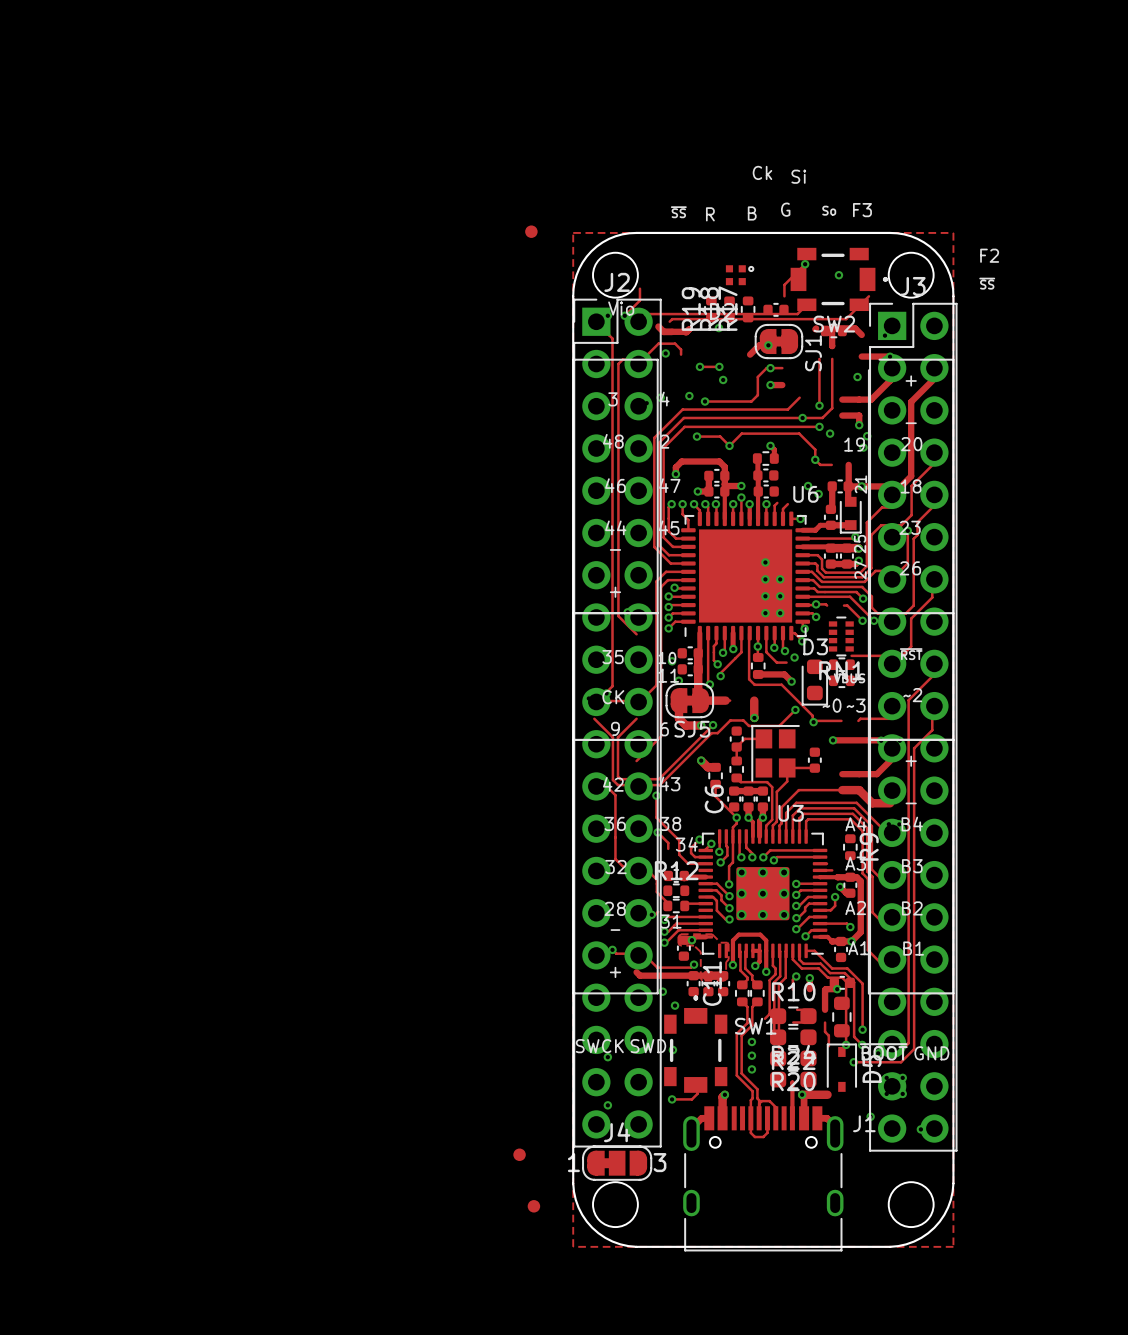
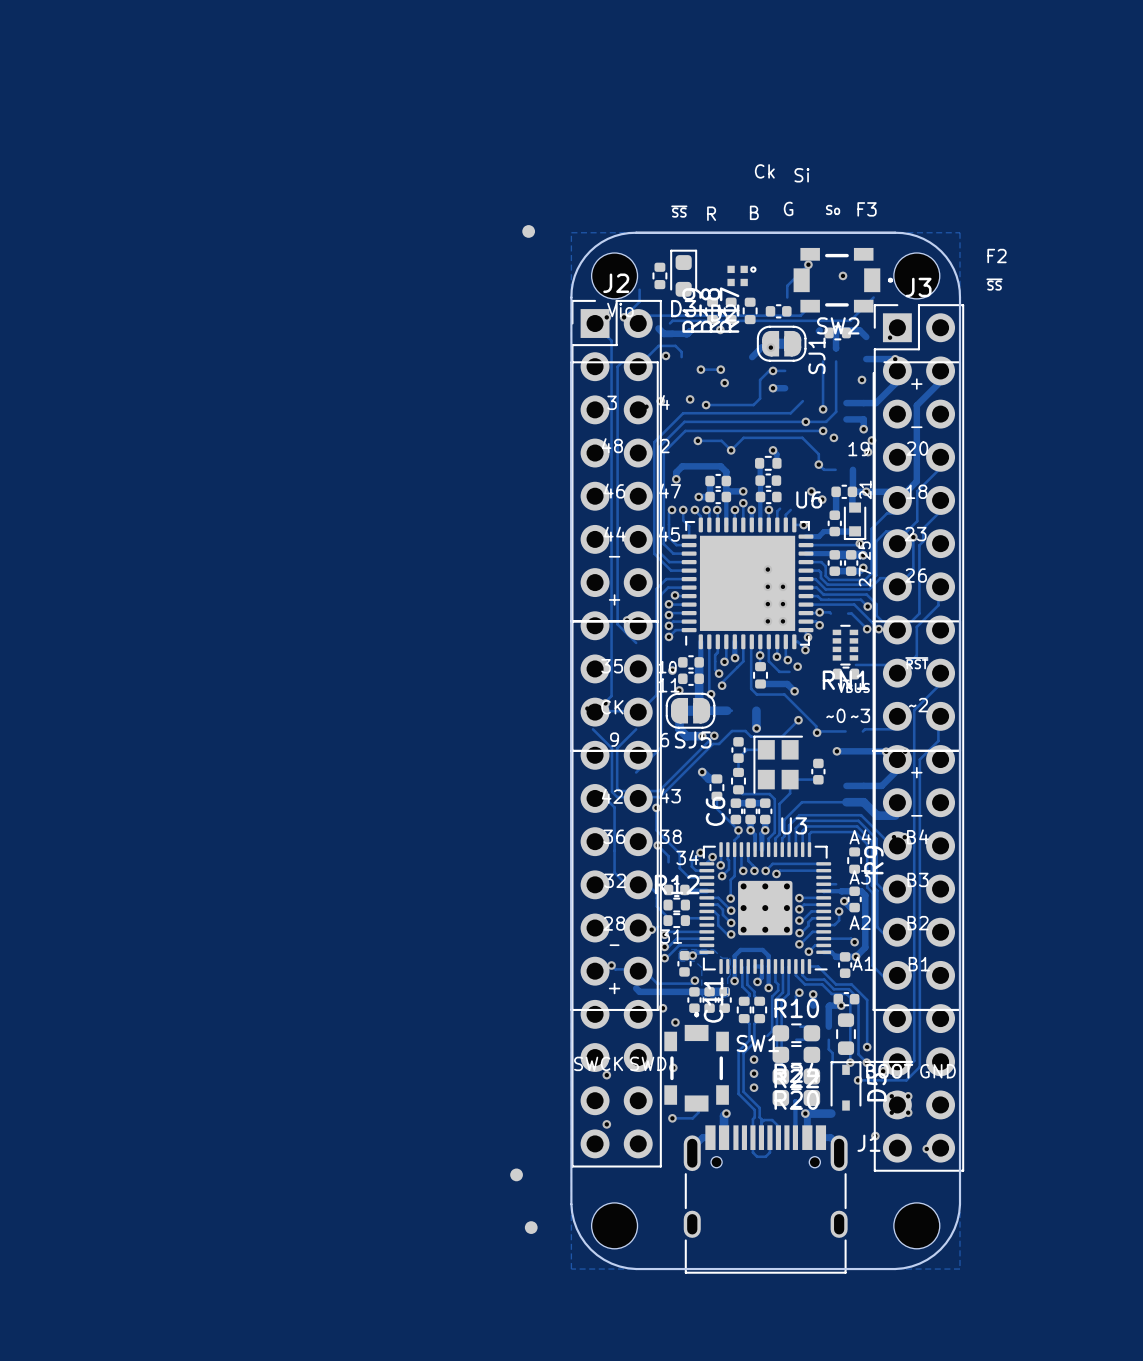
part: none -> (659, 275)
part: (841, 680) -> none
D3 rotation: 0° (814, 682) -> 180° (683, 273)
D3 position: (814, 682) -> (683, 273)
J4: (617, 1163) -> none

